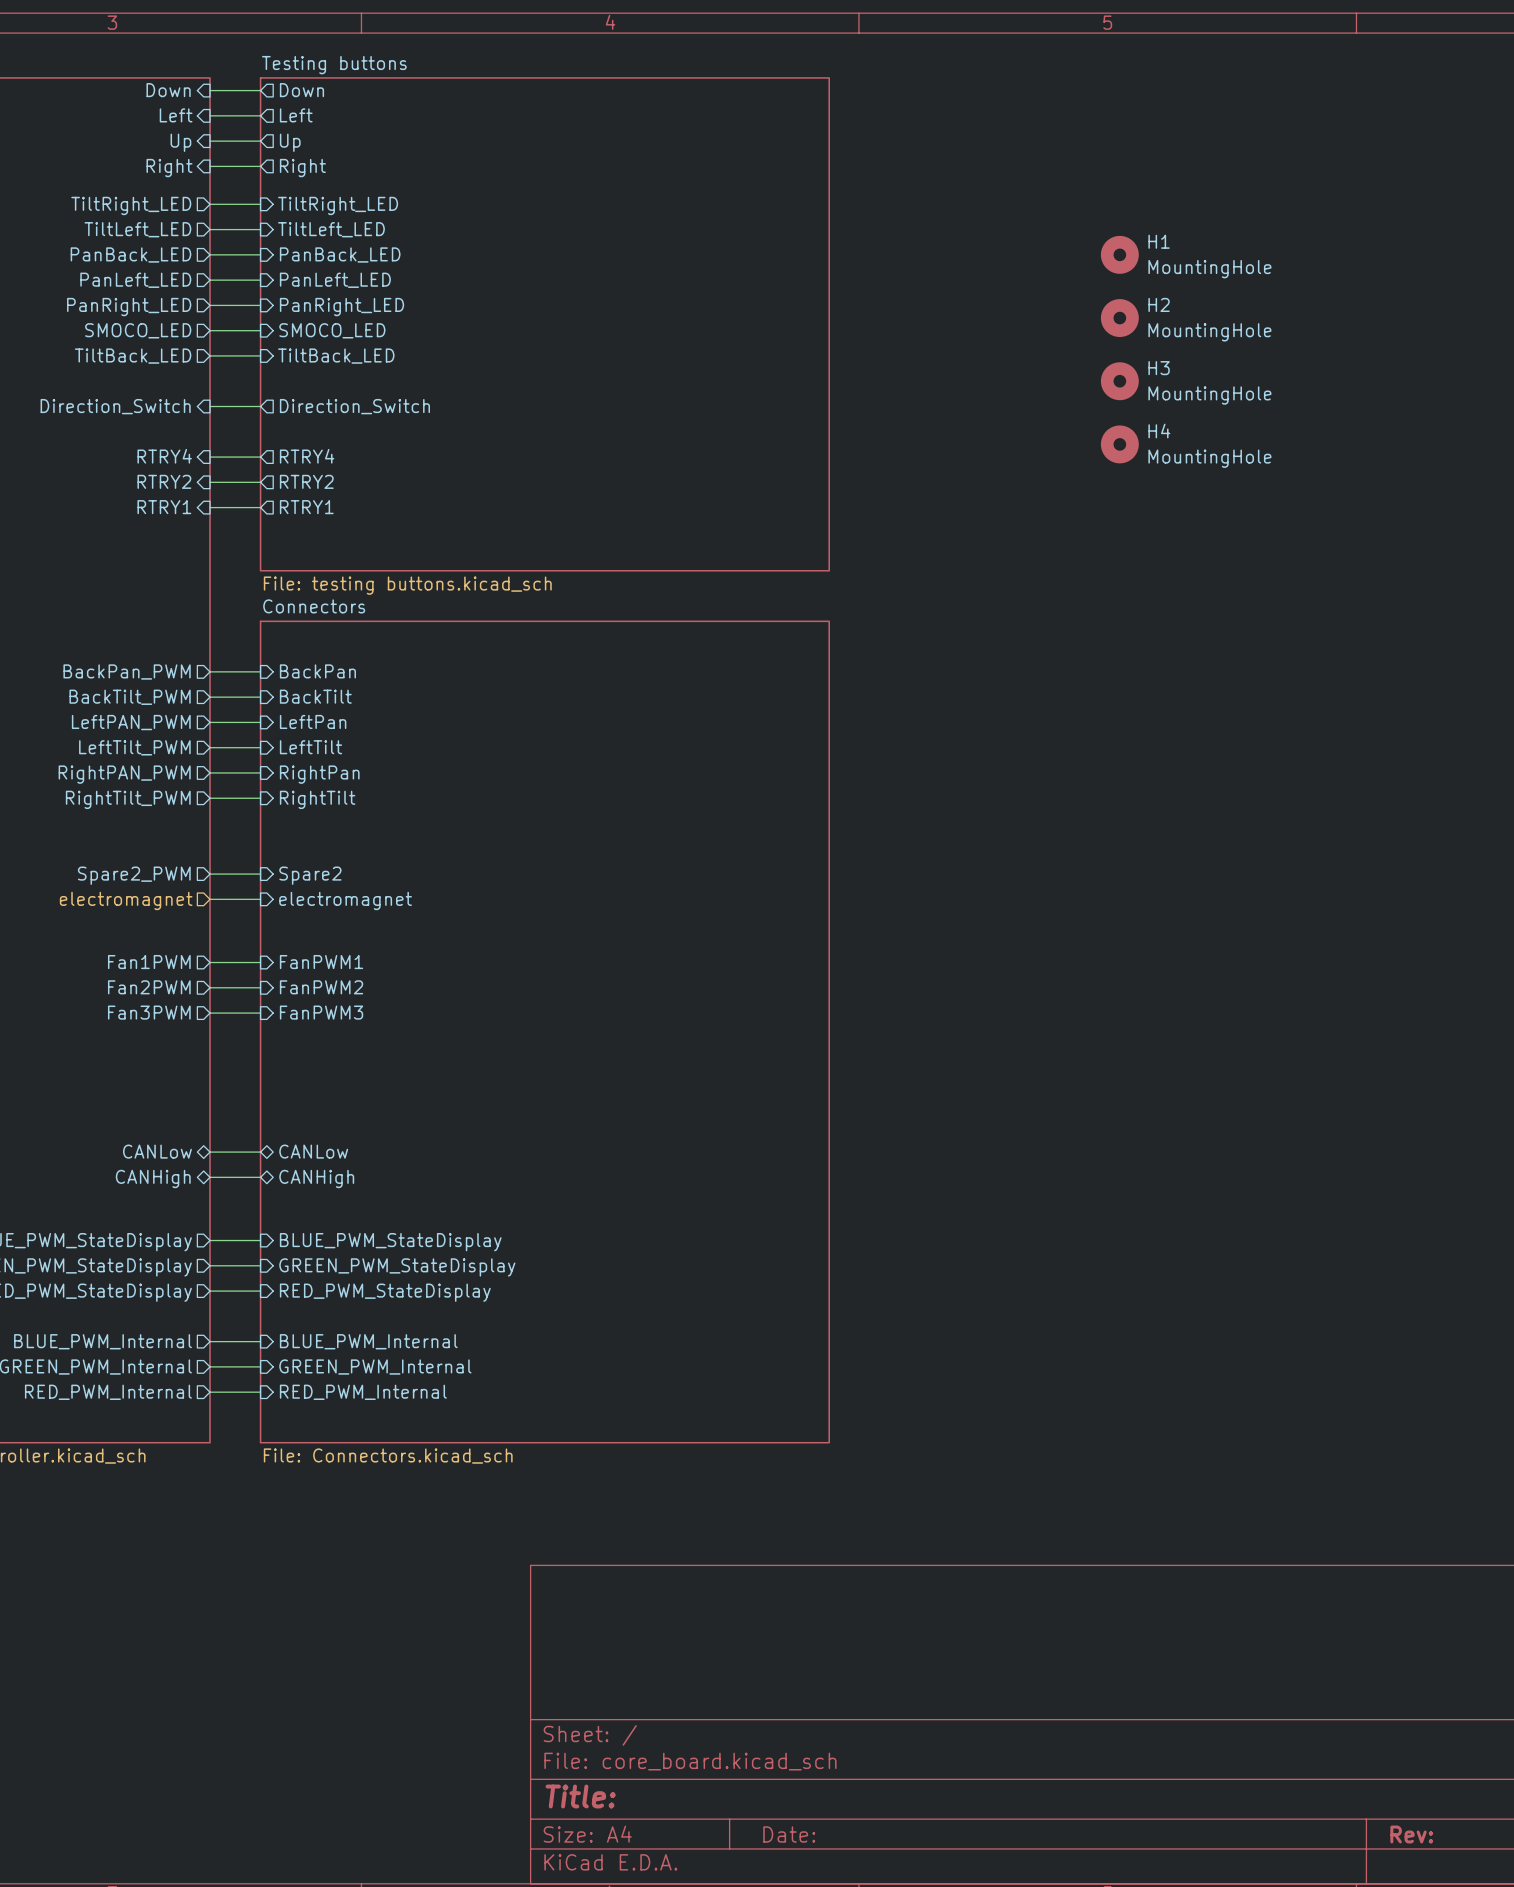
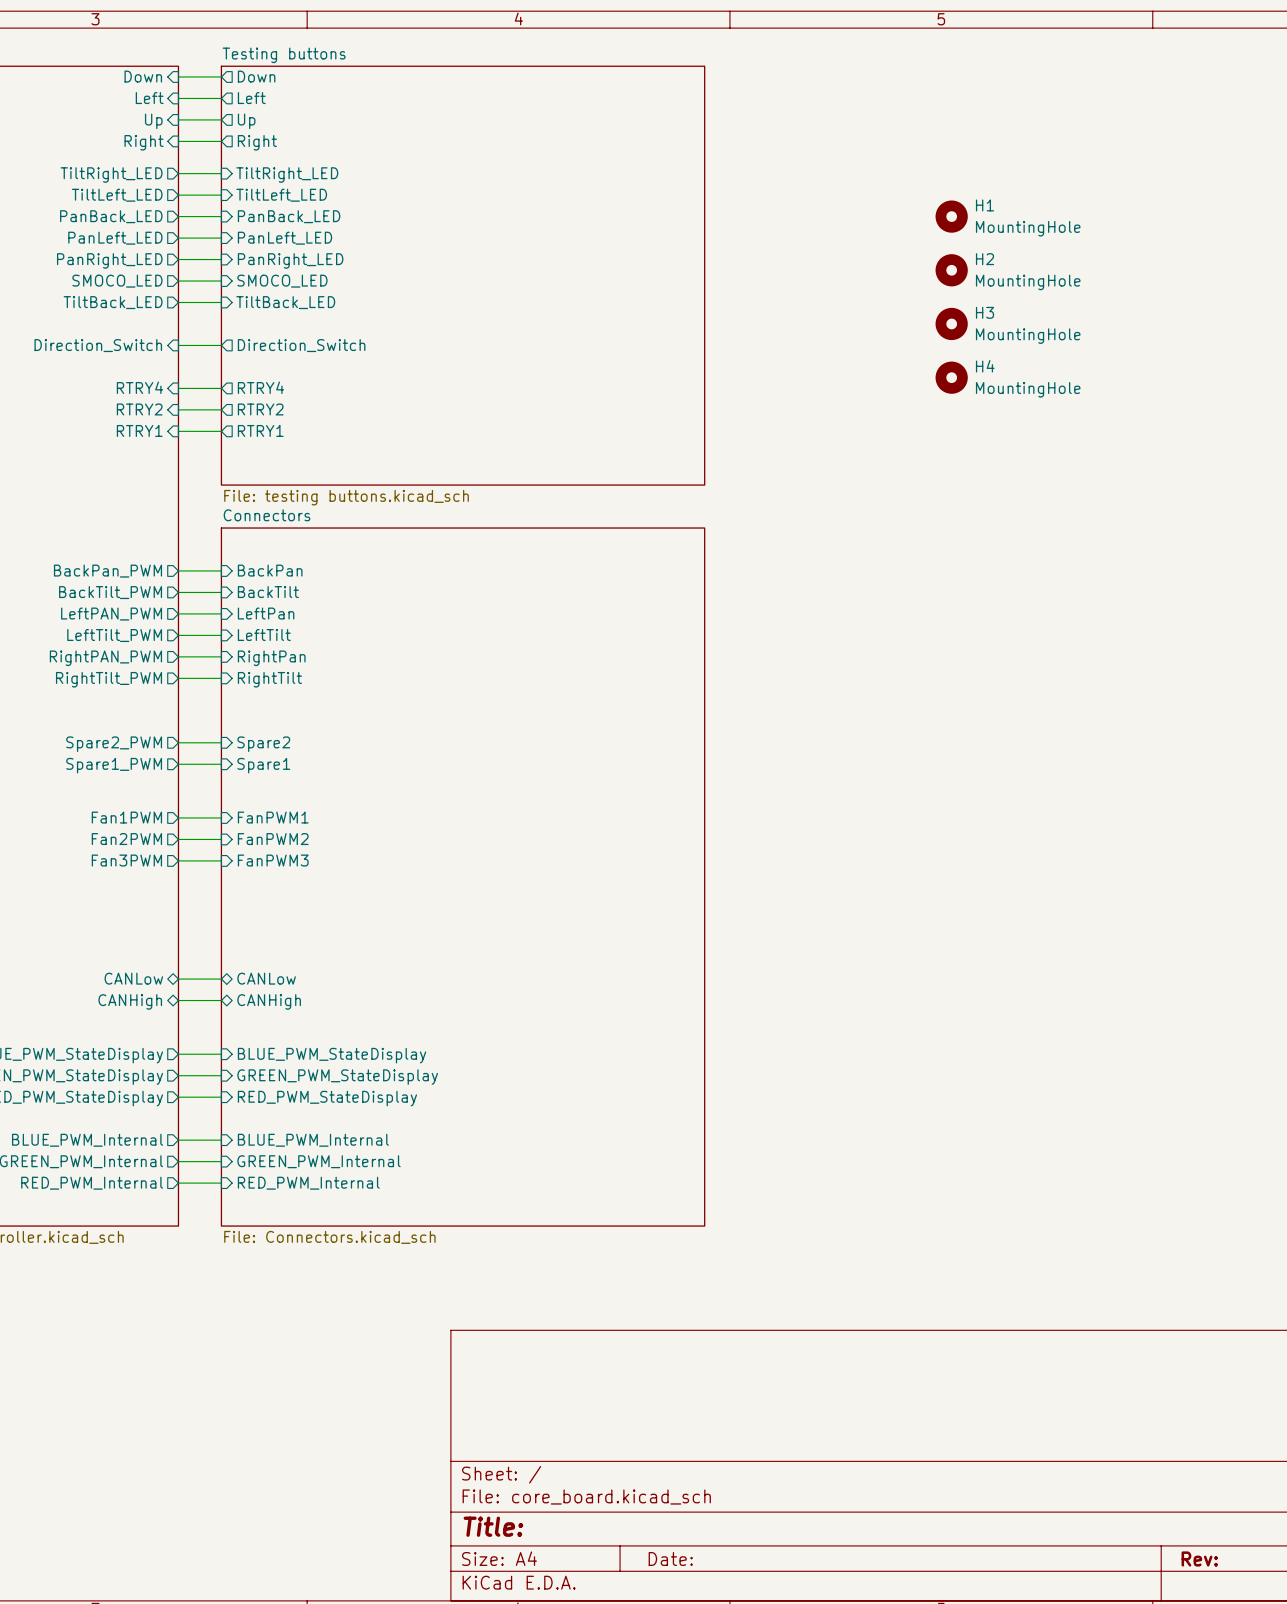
hierarchical label: electromagnet (126, 900) -> none
sheet pin: none -> Spare1_PWM (114, 765)
sheet pin: electromagnet (345, 900) -> Spare1 (263, 765)

